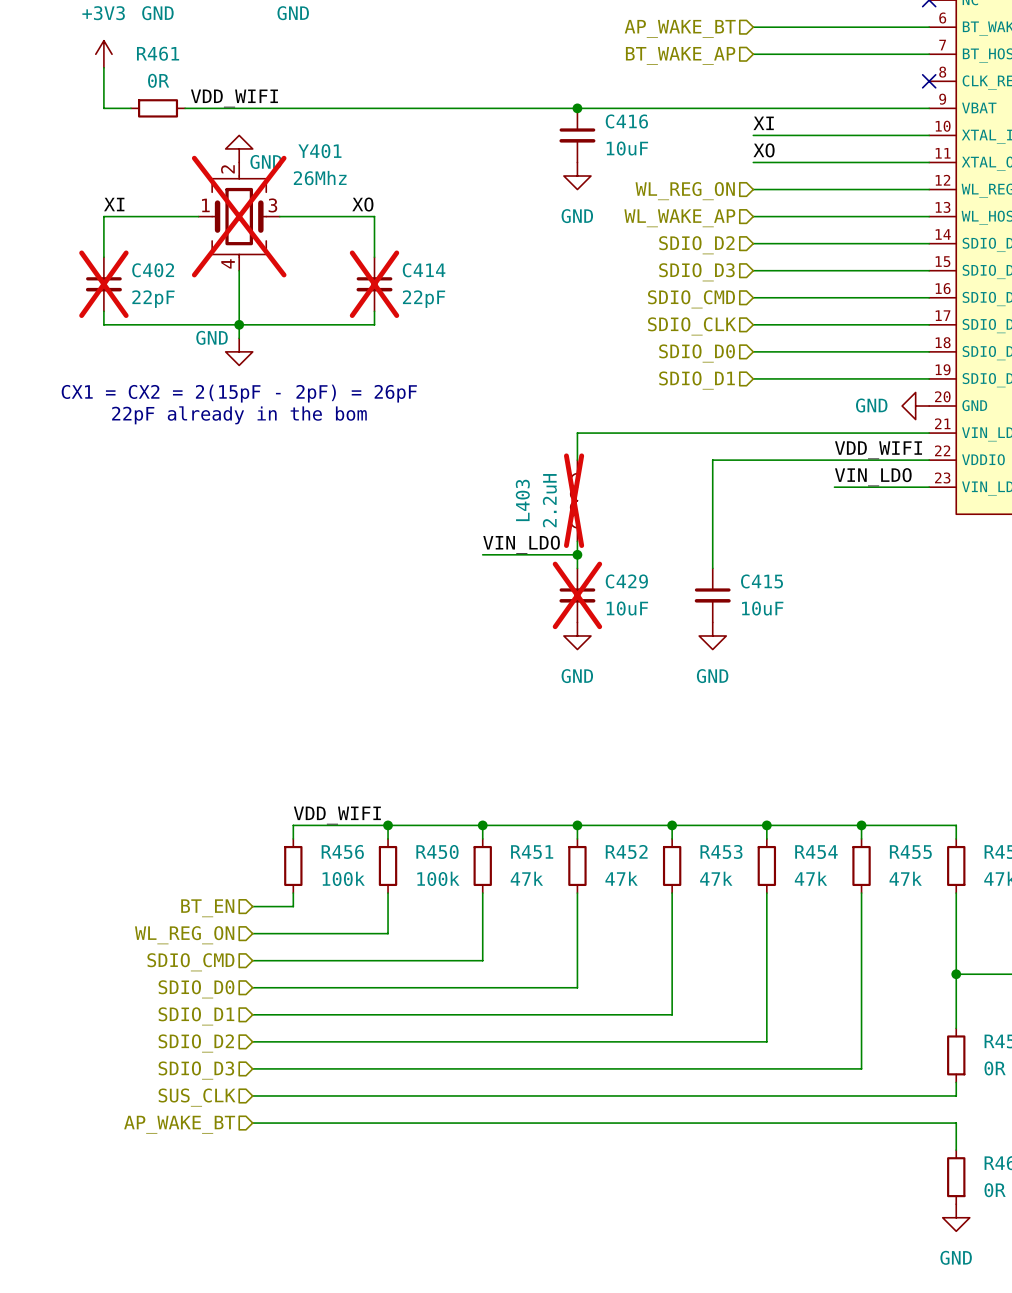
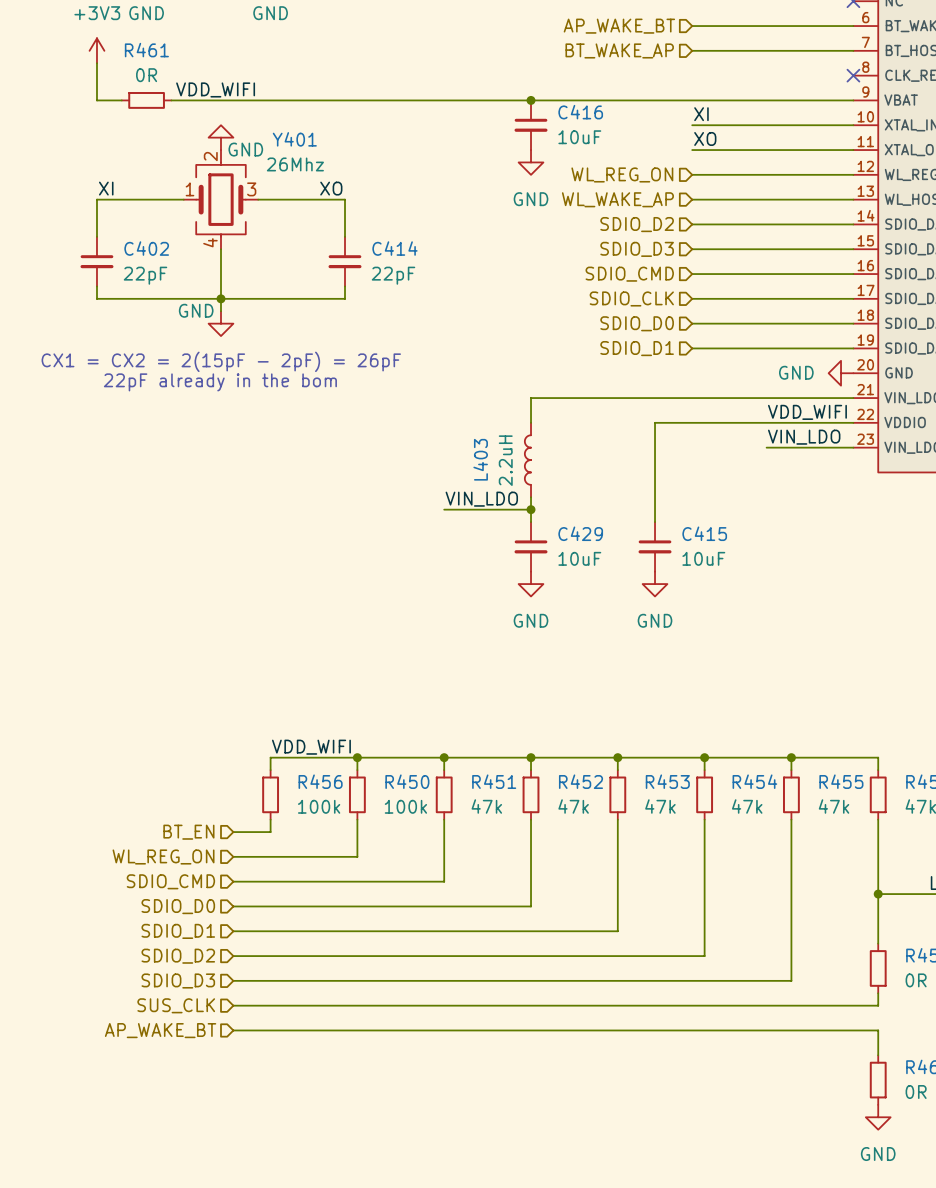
Y401 do-not-place cross: (239, 216) -> none
C402 do-not-place cross: (103, 284) -> none
C414 do-not-place cross: (374, 284) -> none
L403 do-not-place cross: (574, 500) -> none
C429 do-not-place cross: (577, 595) -> none

